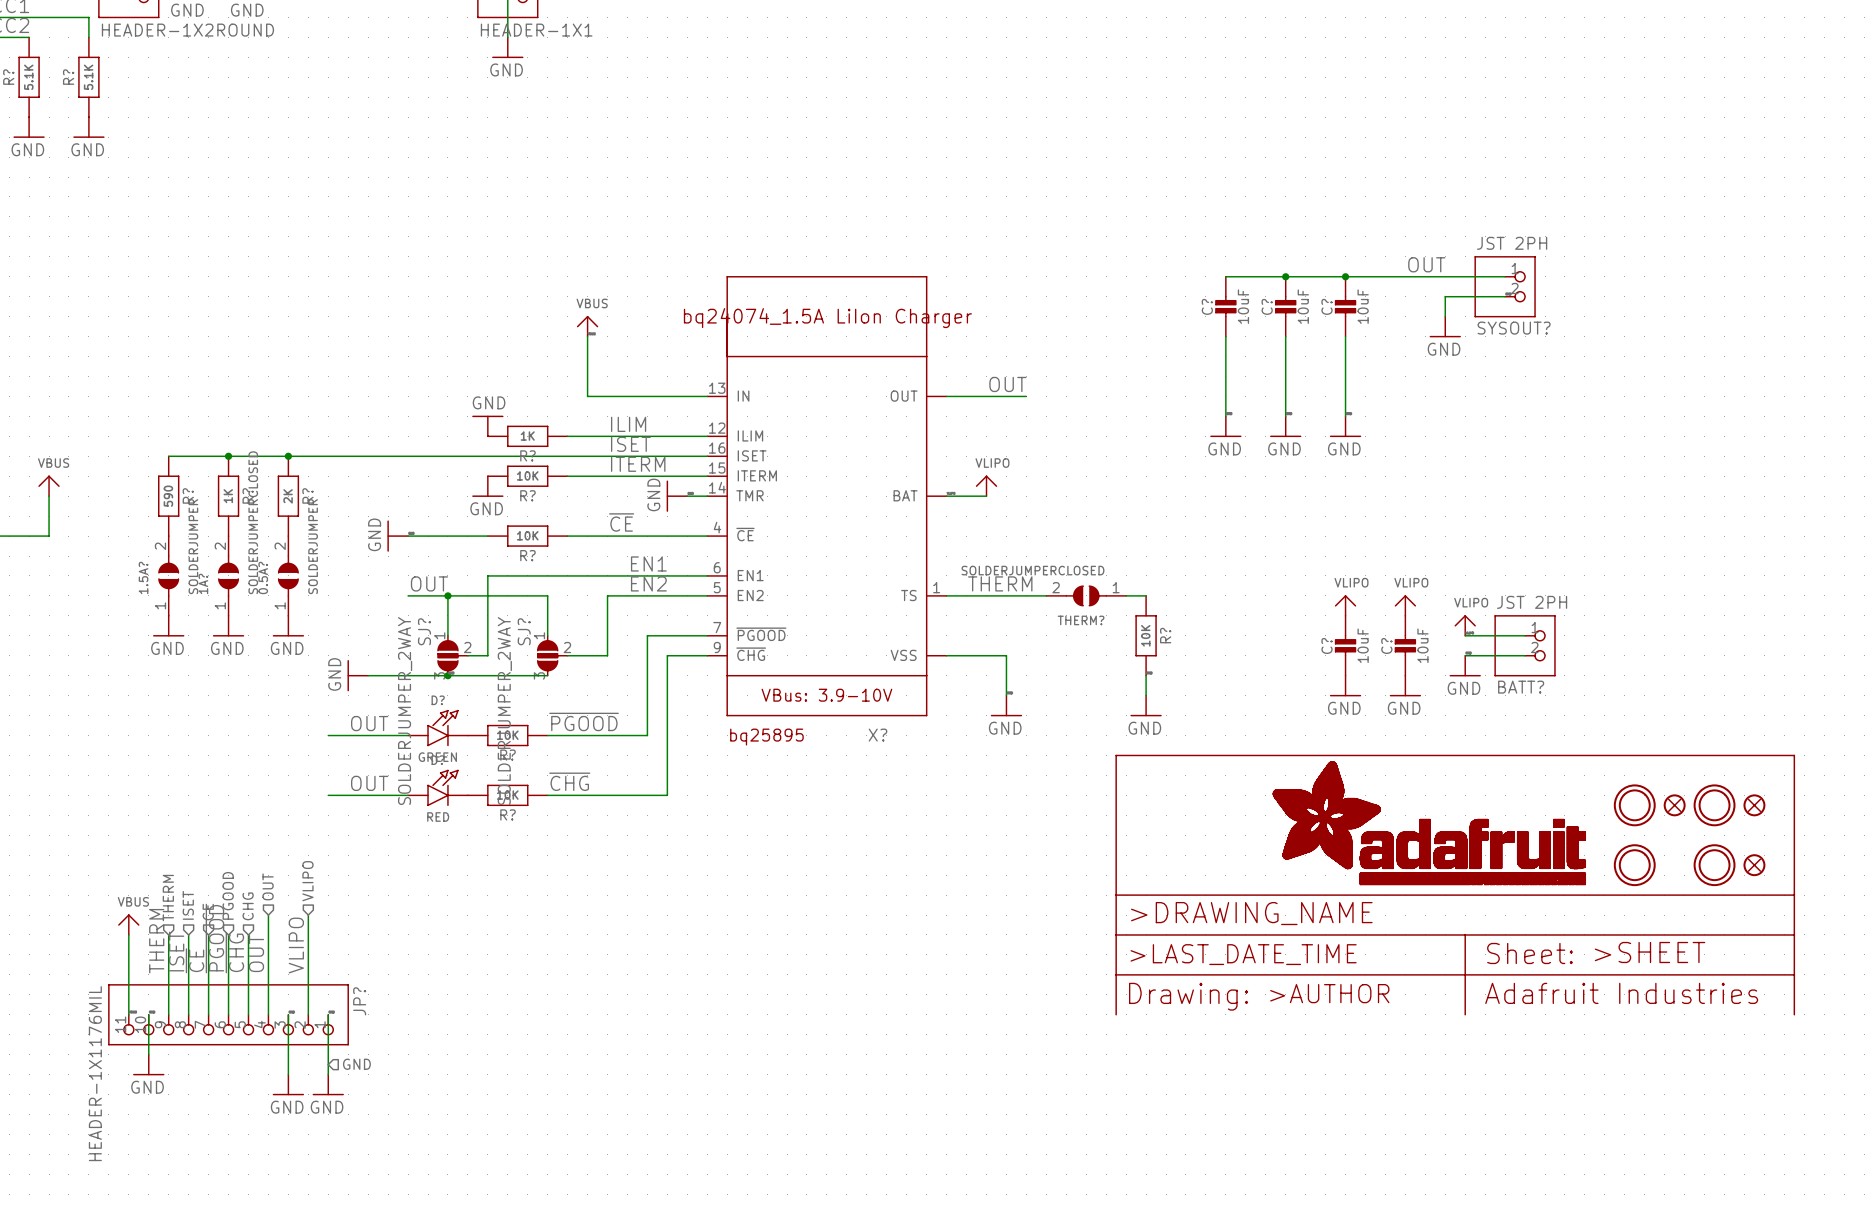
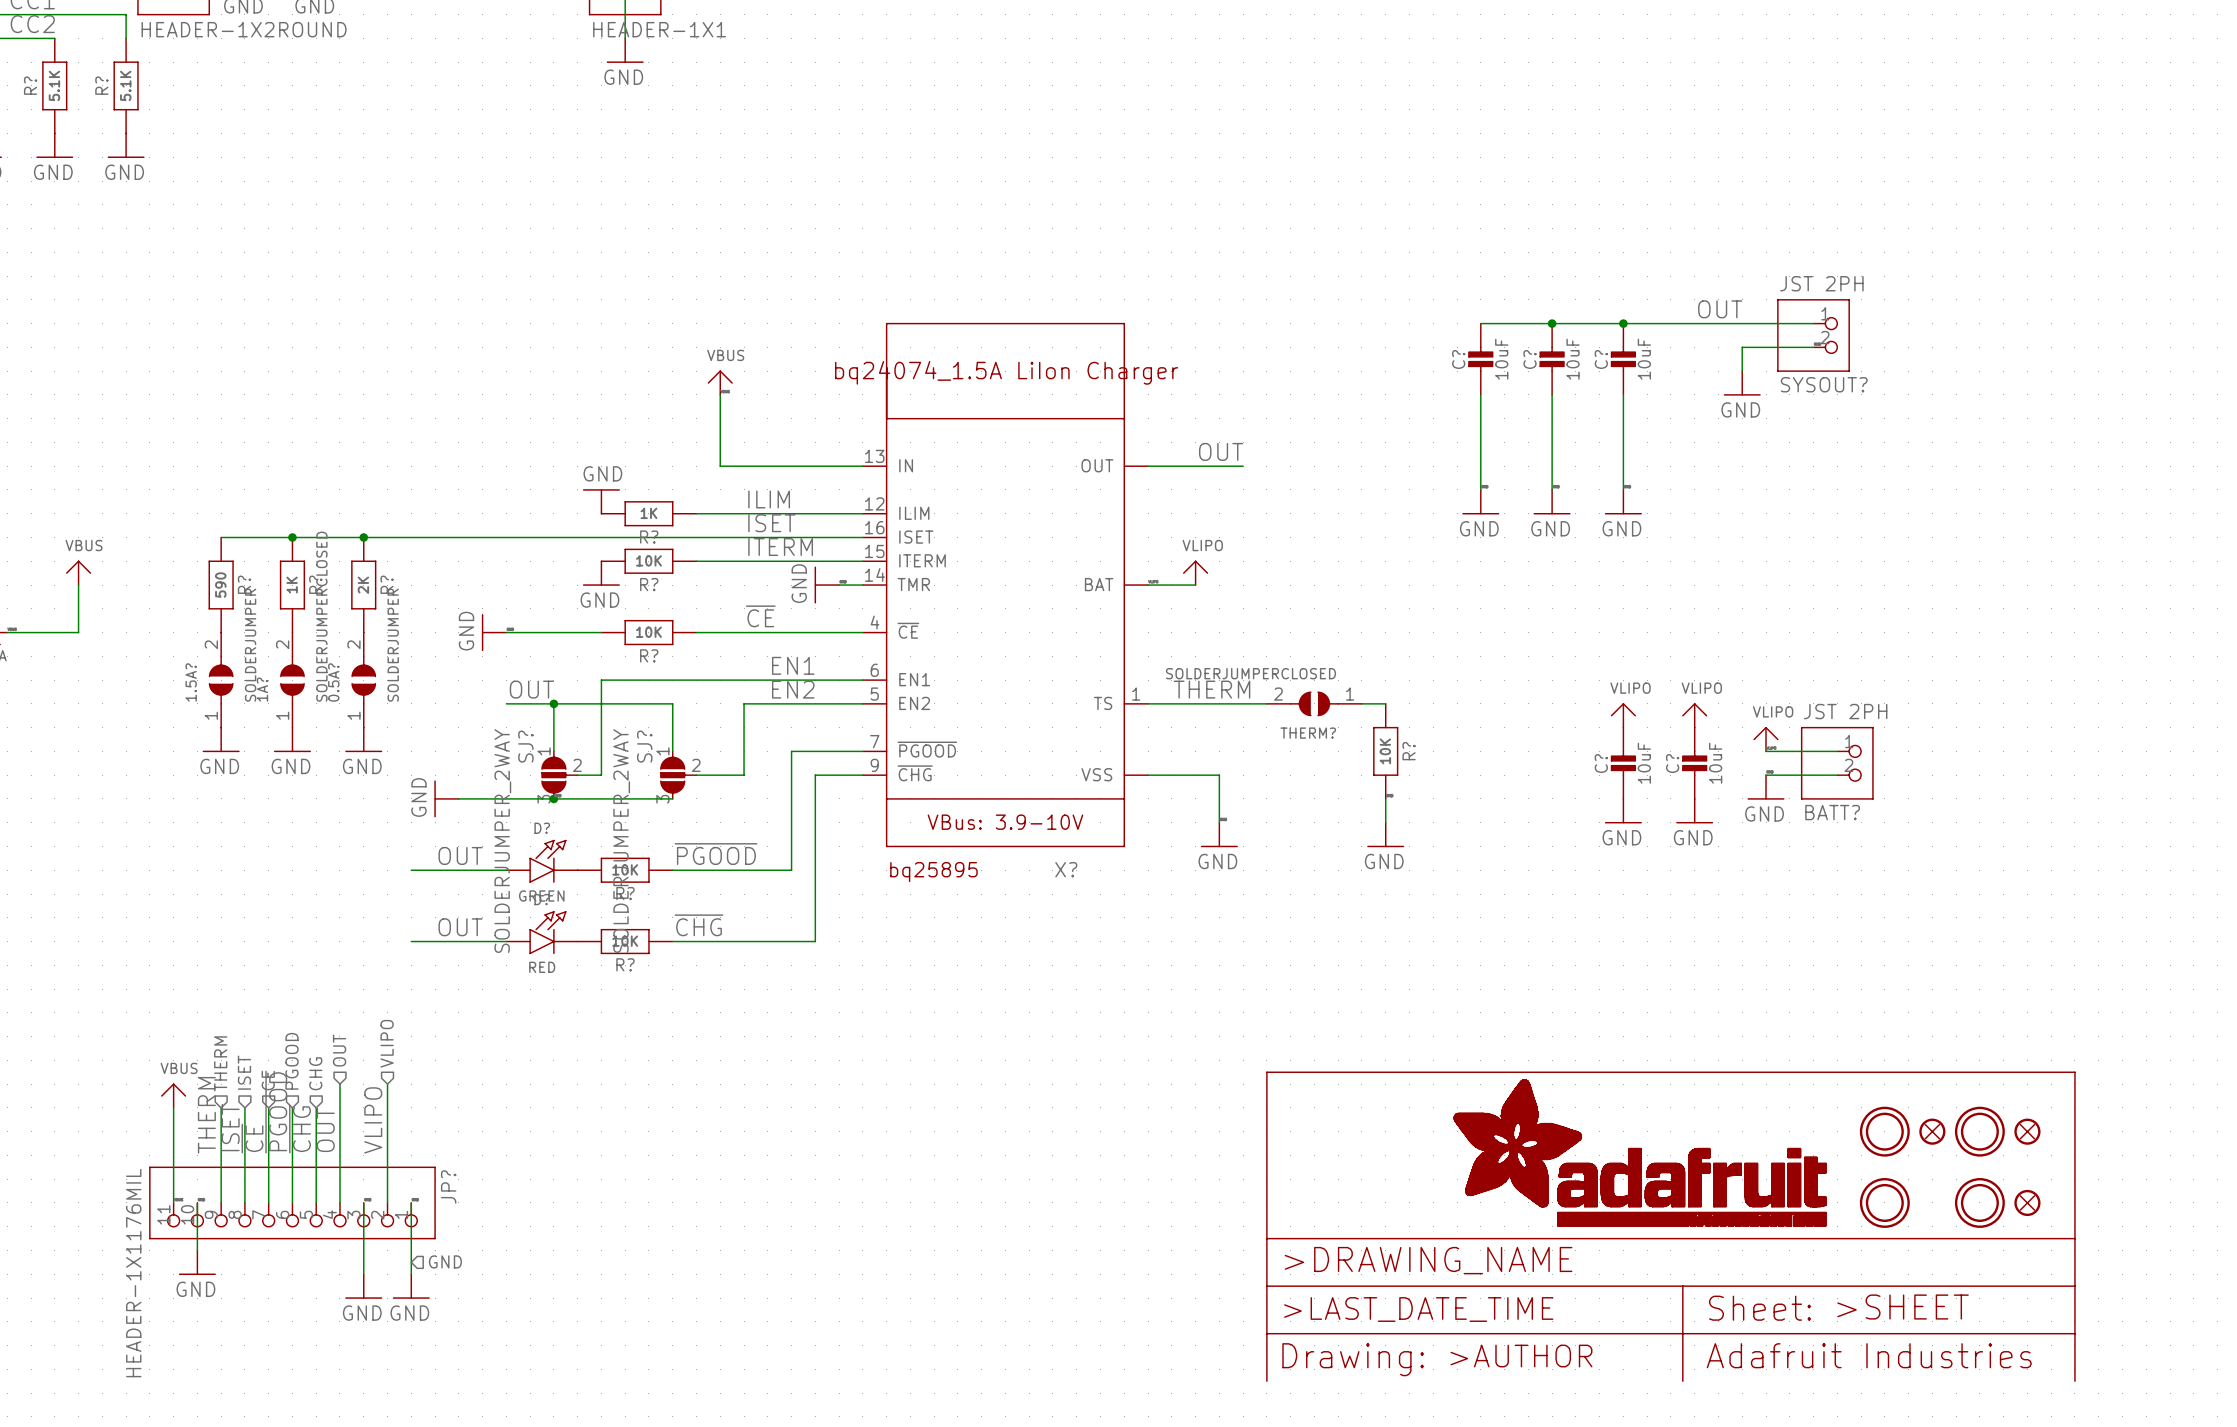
part: (1634, 805) -> none
part: (1674, 805) -> none
part: (1714, 805) -> none
part: (1754, 805) -> none
part: (1634, 865) -> none
part: (1714, 865) -> none
part: (1754, 865) -> none
power symbol position: (1455, 885) -> (1670, 1226)
part: none -> (1884, 1131)
part: none -> (1932, 1131)
part: none -> (1979, 1131)
part: none -> (2027, 1131)
part: none -> (1884, 1202)
part: none -> (1979, 1202)
part: none -> (2027, 1202)

